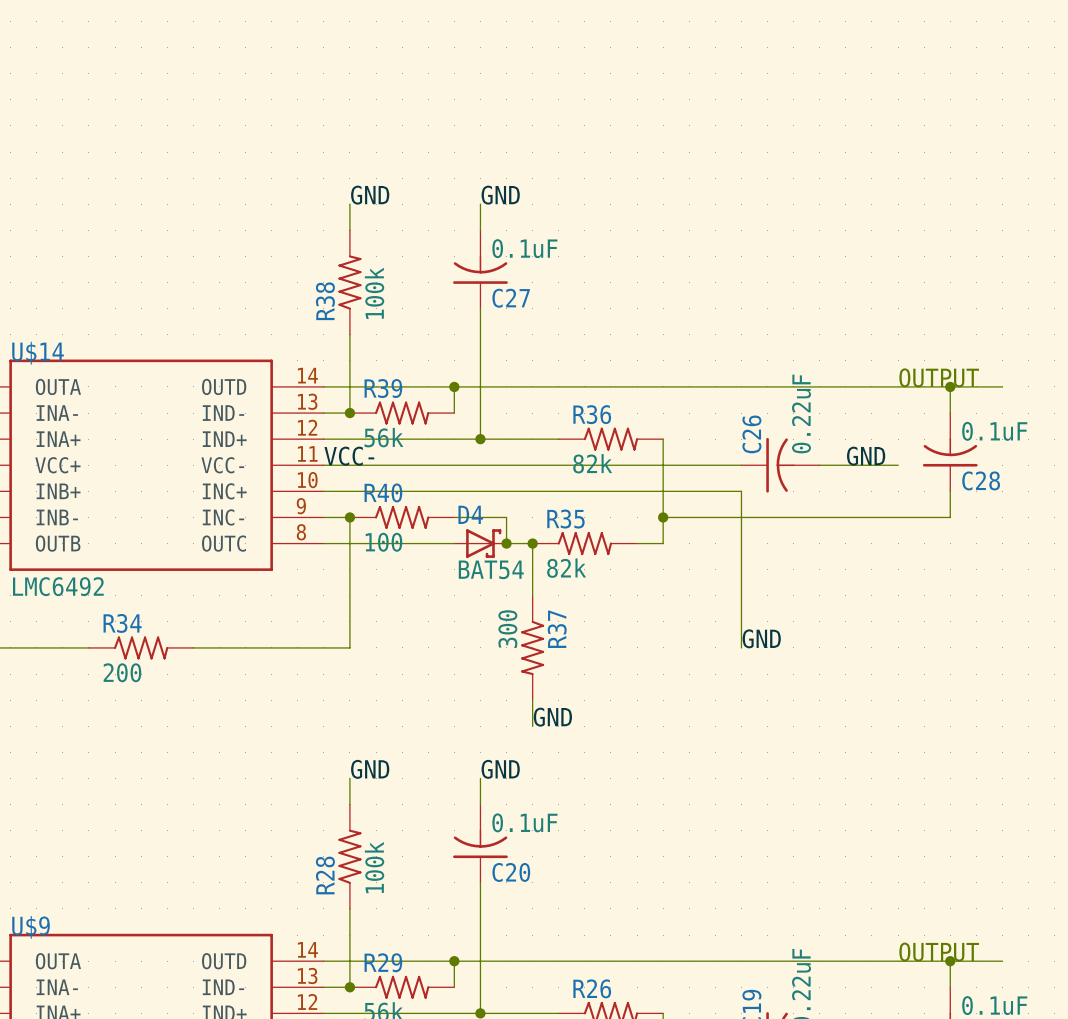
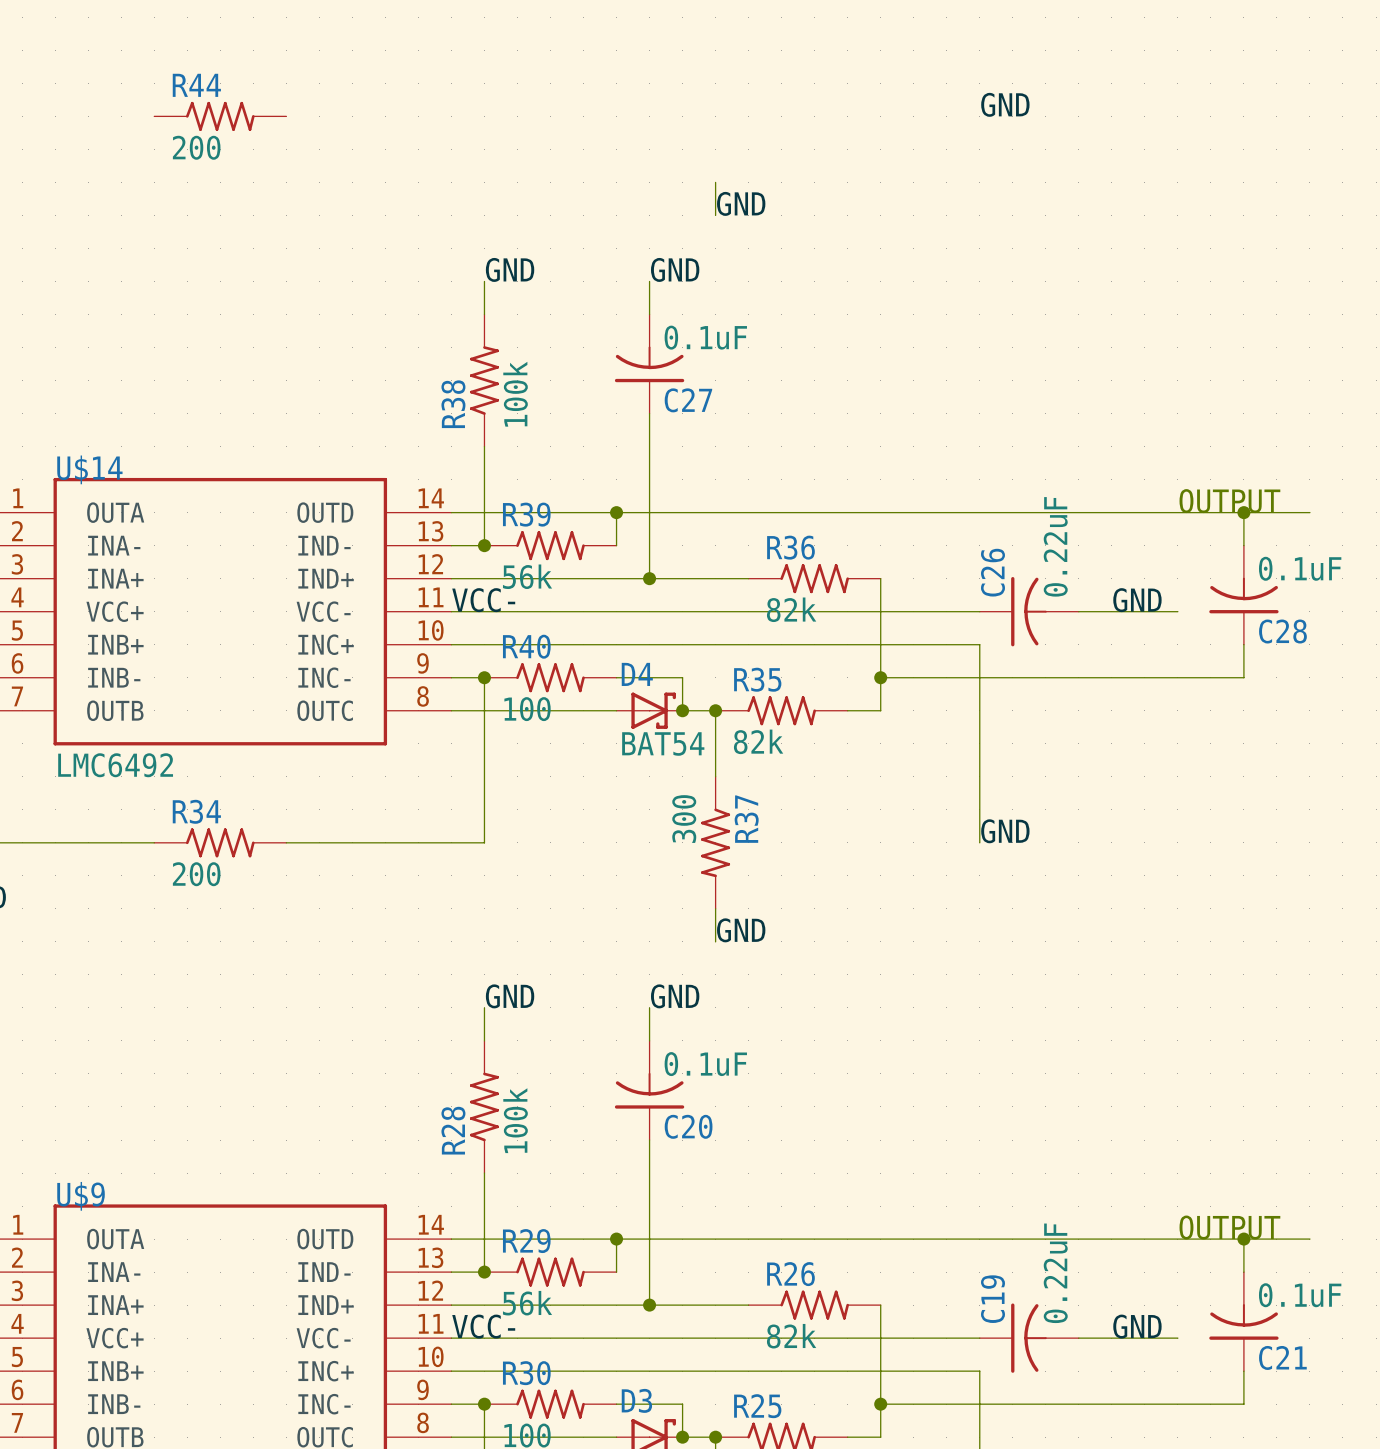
label: none -> GND (1005, 104)
R44: none -> 200 (220, 116)
wire: none -> (715, 182) (715, 215)
label: none -> GND (741, 203)

